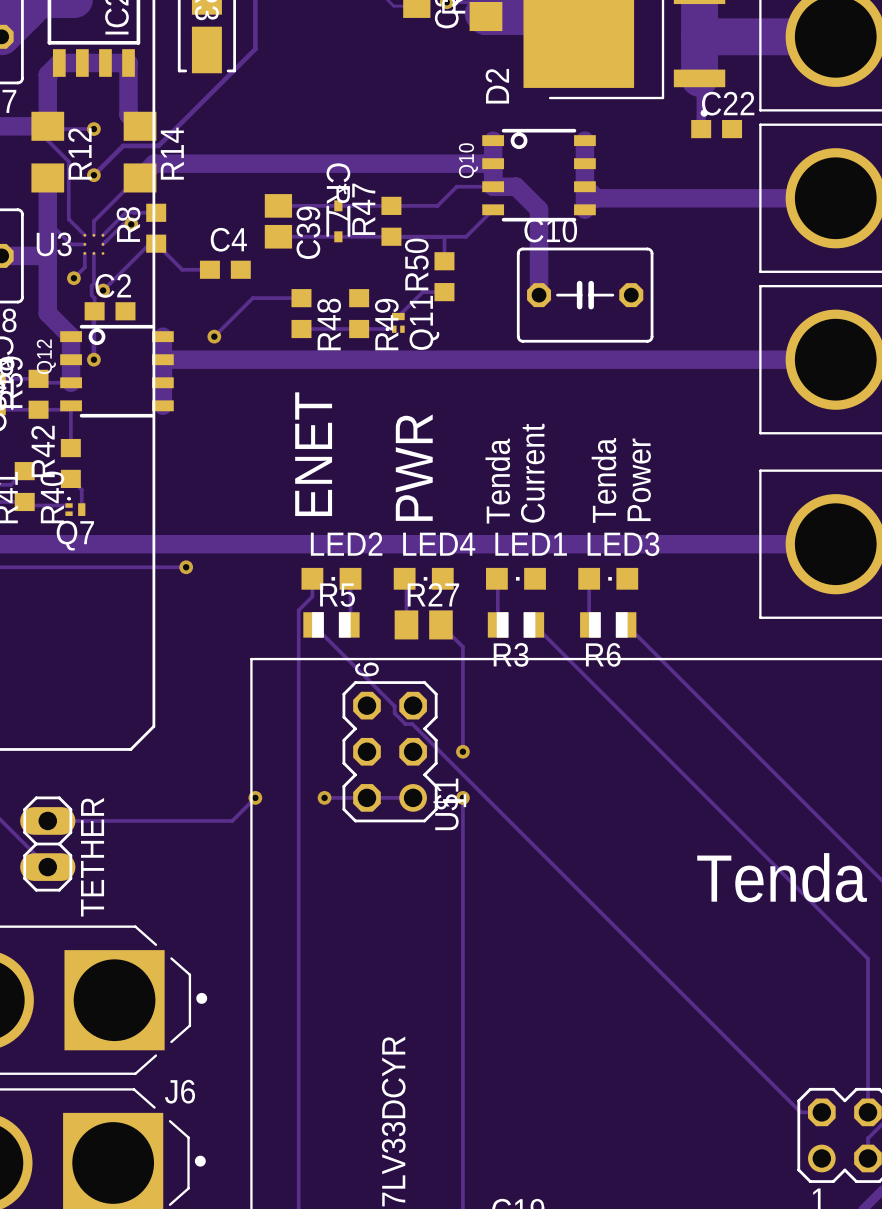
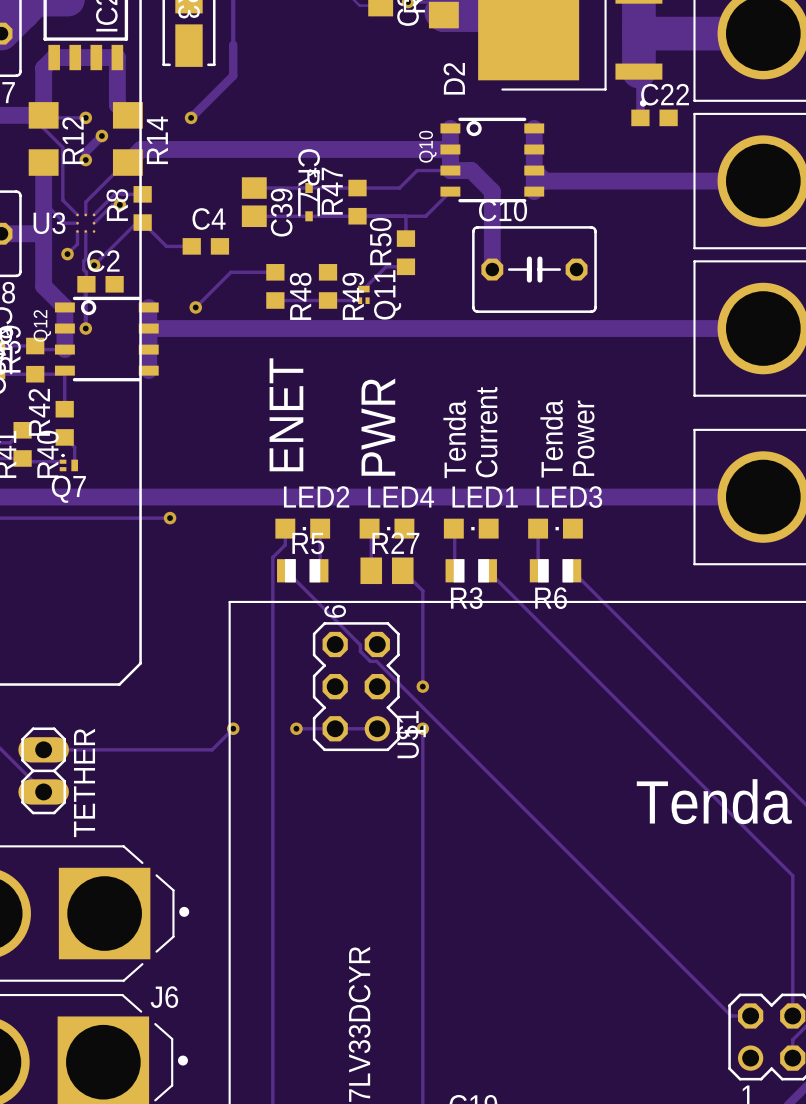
track: (255, 49) (158, 145) (123, 145) (93, 175) -> (233, 44) (233, 75) (191, 117)
via: none -> (191, 117)
track: none -> (101, 136) (85, 152) (85, 160)
via: none -> (101, 136)

